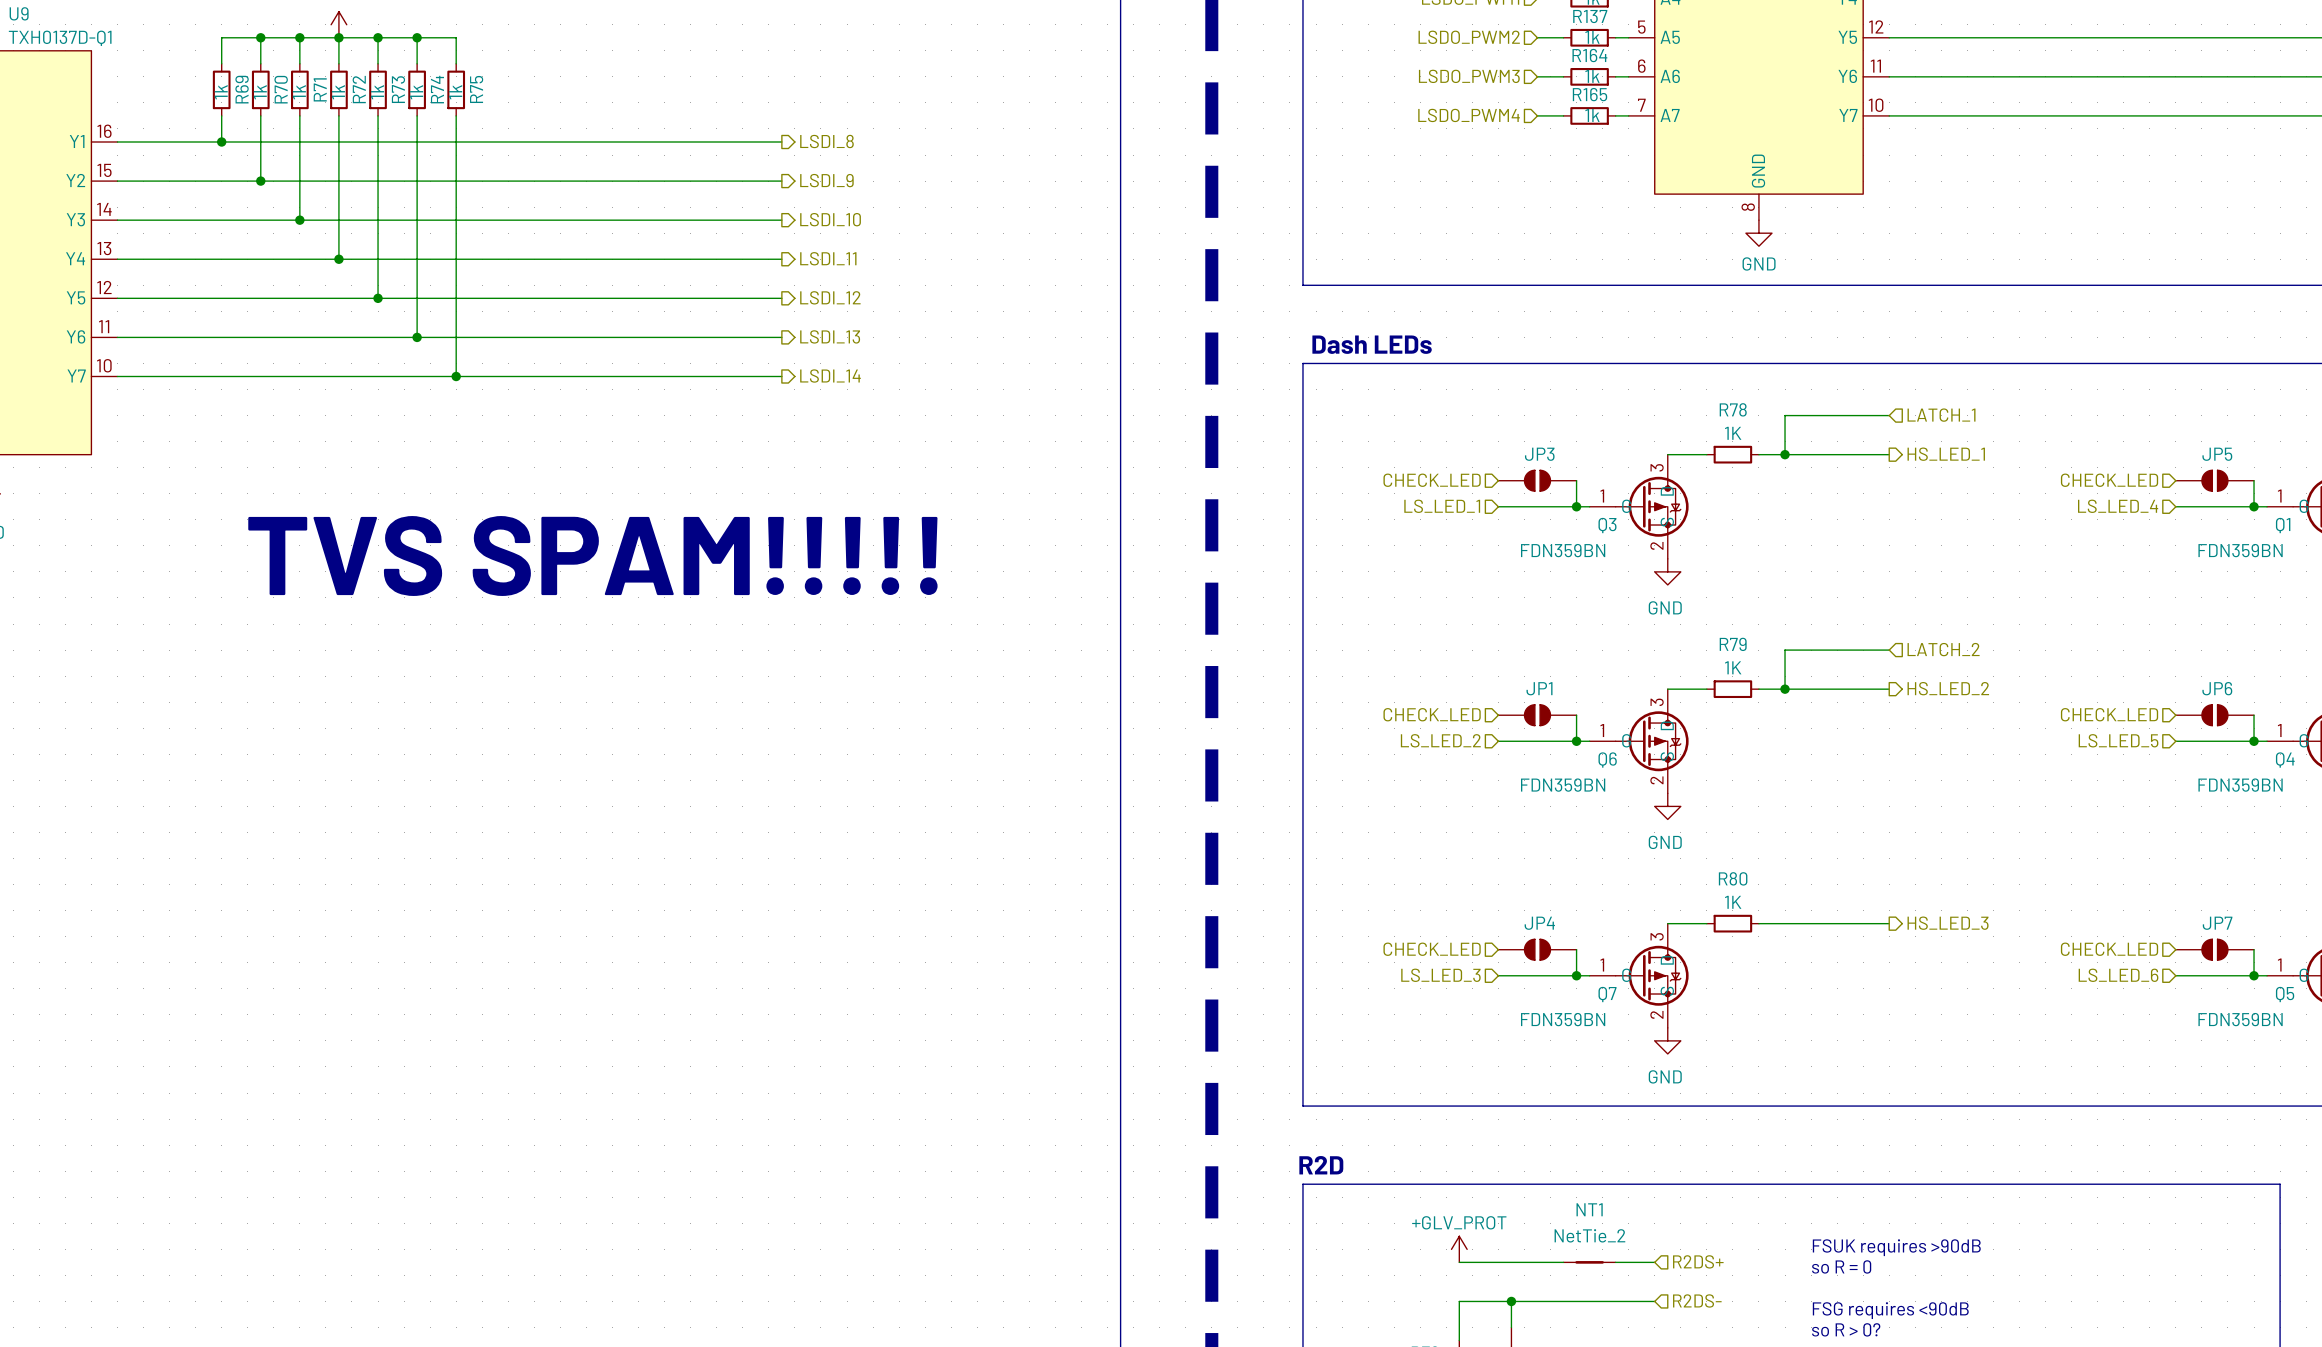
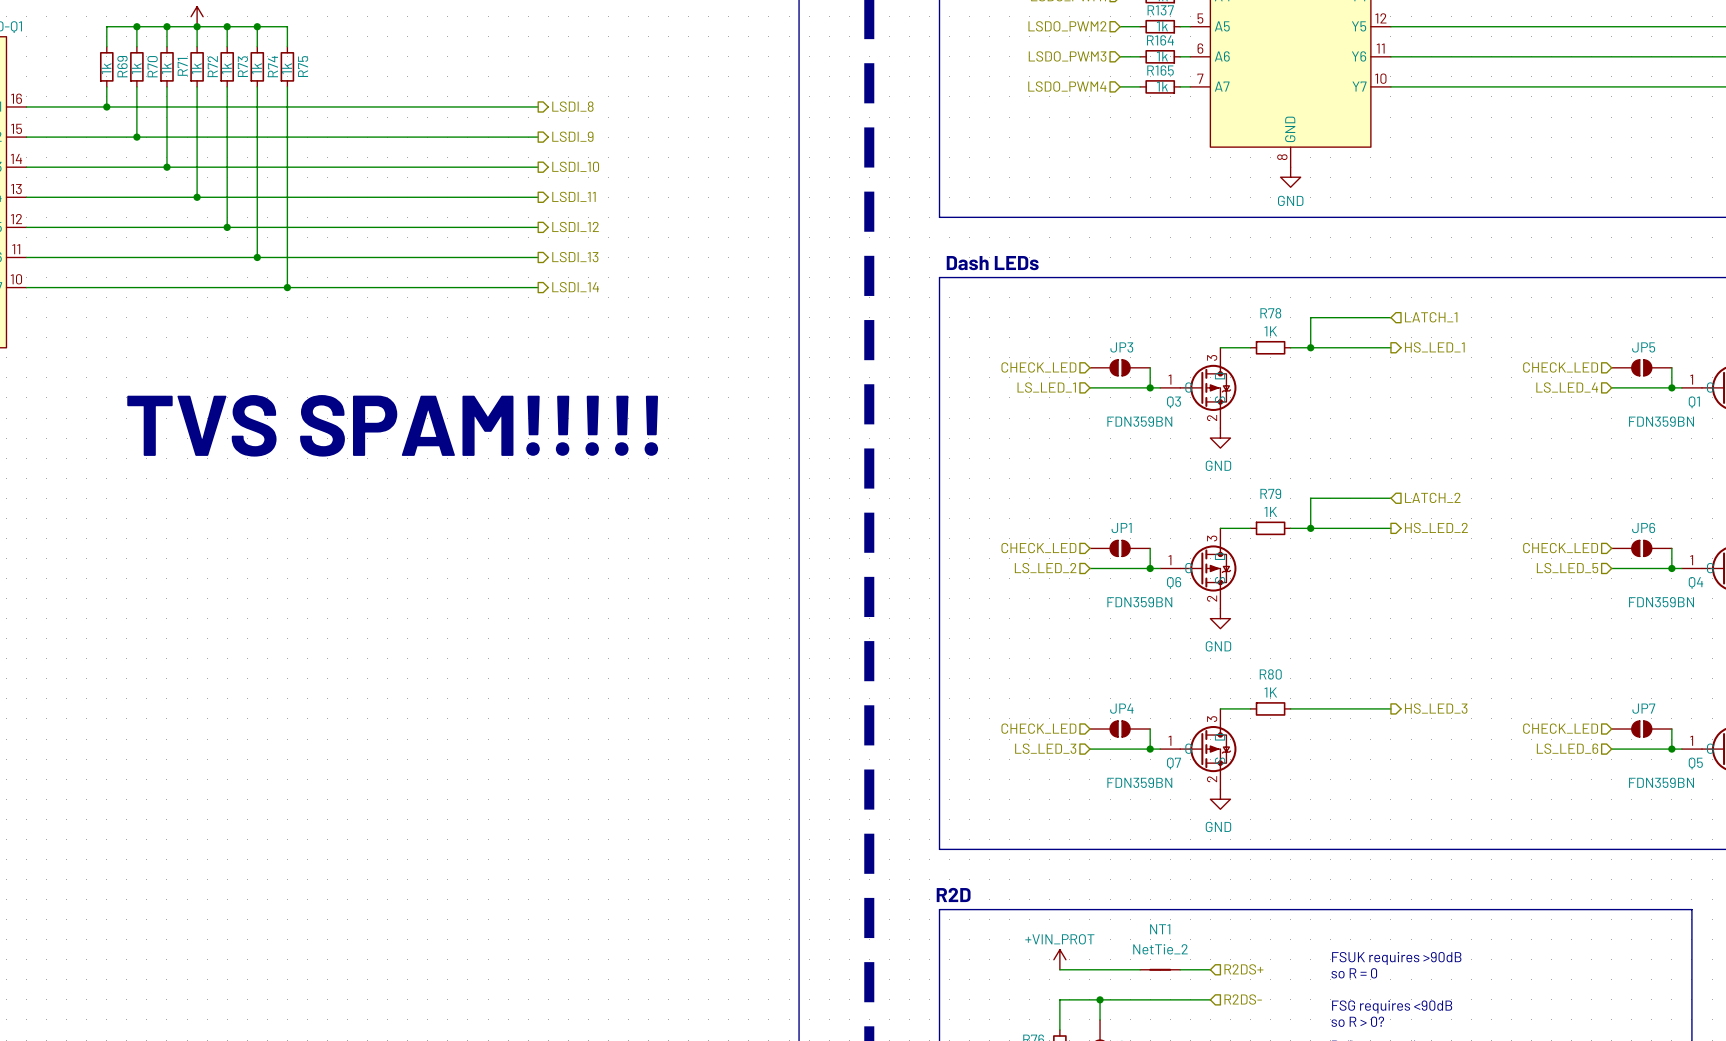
power symbol: +GLV_PROT (1459, 1249) -> +VIN_PROT (1059, 959)

